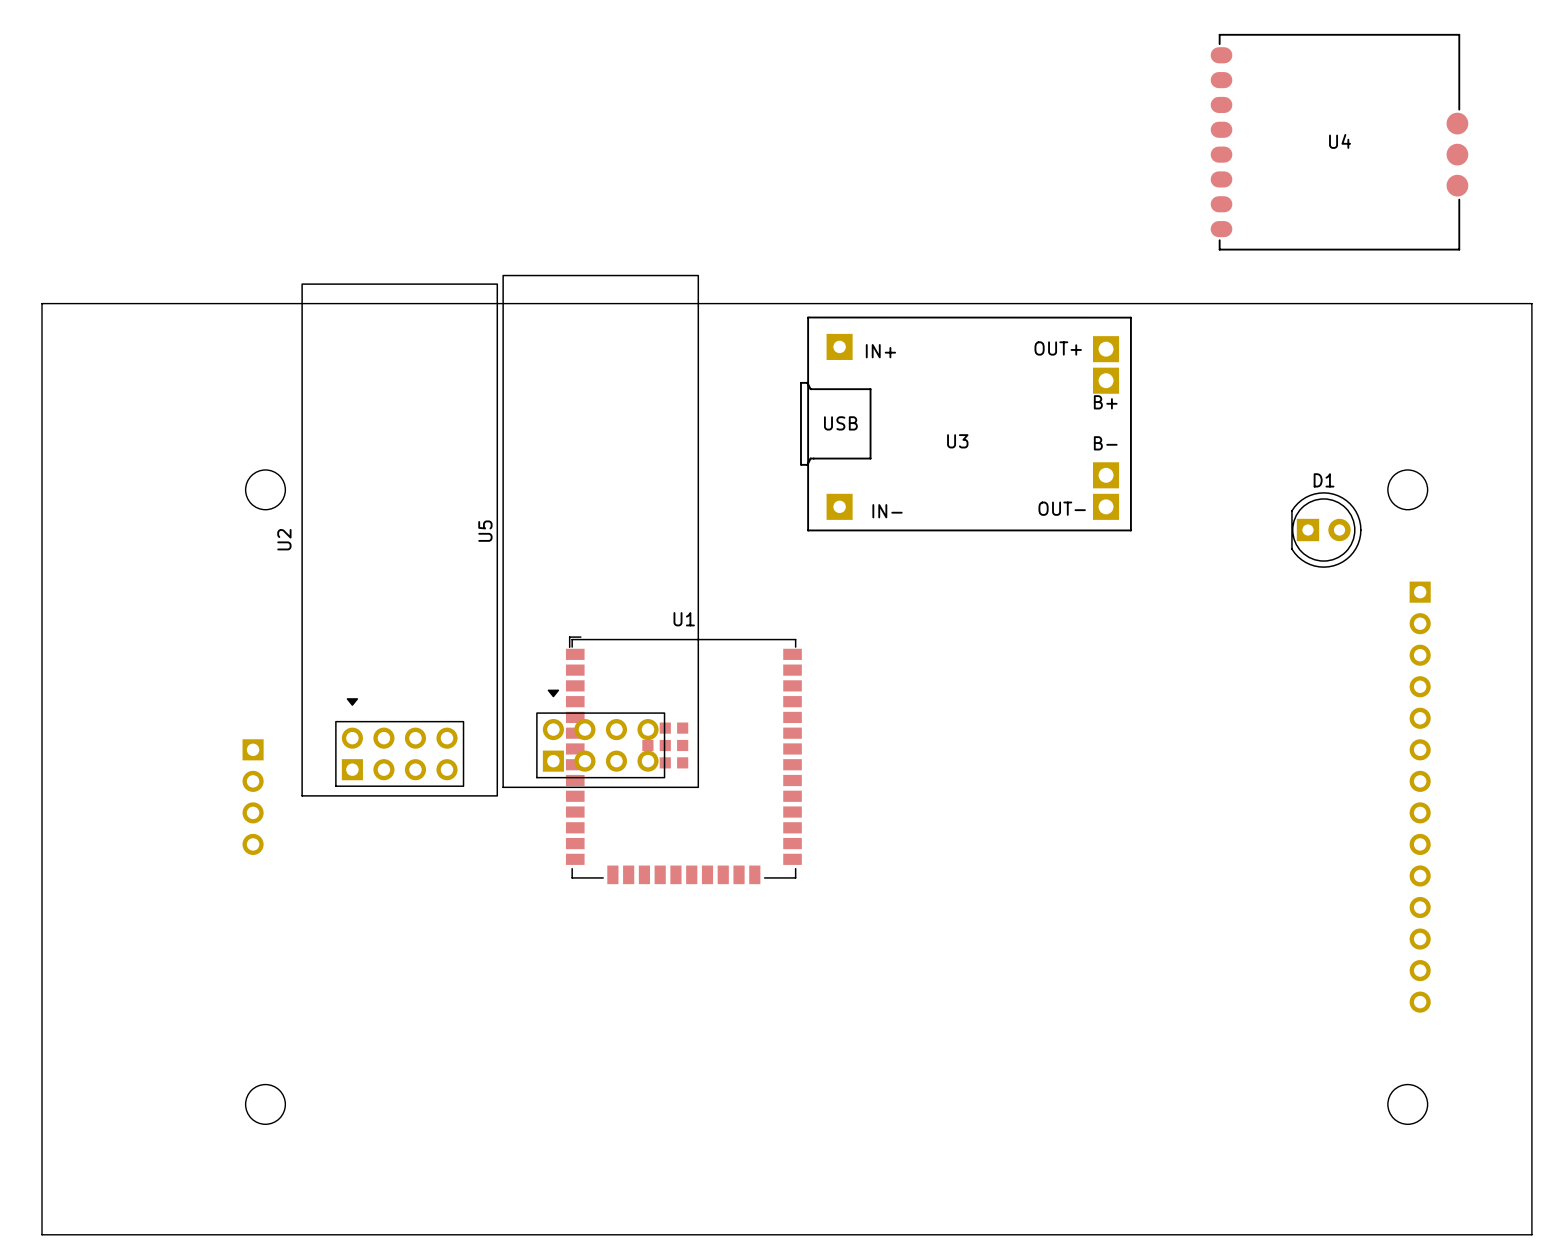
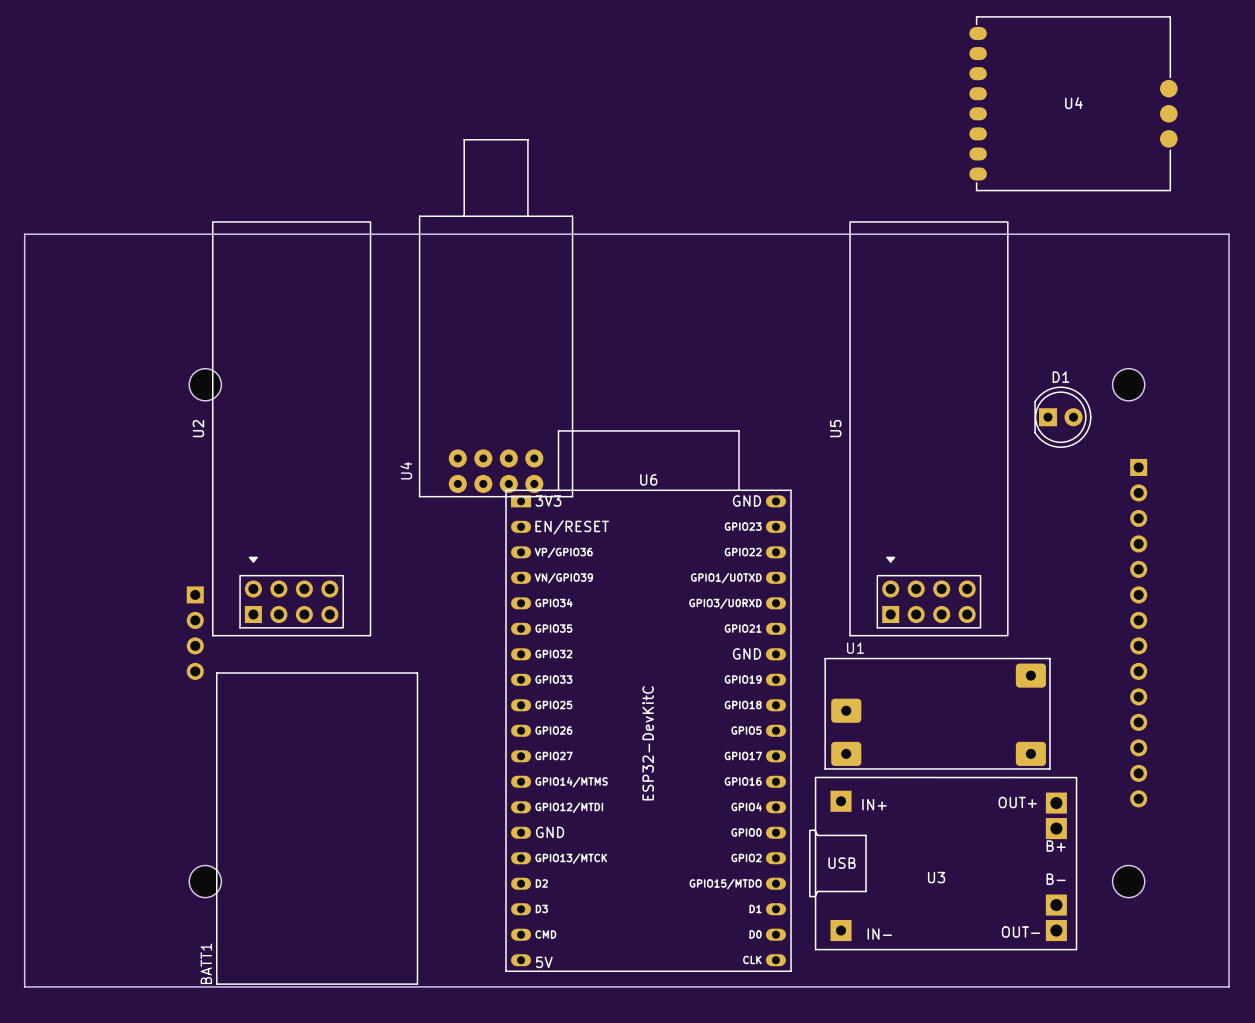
U4: none -> (496, 318)
U3 position: (965, 424) -> (943, 863)
U5 position: (600, 531) -> (928, 428)
U2 position: (399, 540) -> (291, 428)
U1 name position: U1 (684, 619) -> U1 (855, 648)
U1 footprint: [565, 636, 802, 885] -> [824, 658, 1051, 770]
U6: none -> ESP32-DevKitC (648, 701)
BATT1: none -> (317, 828)

